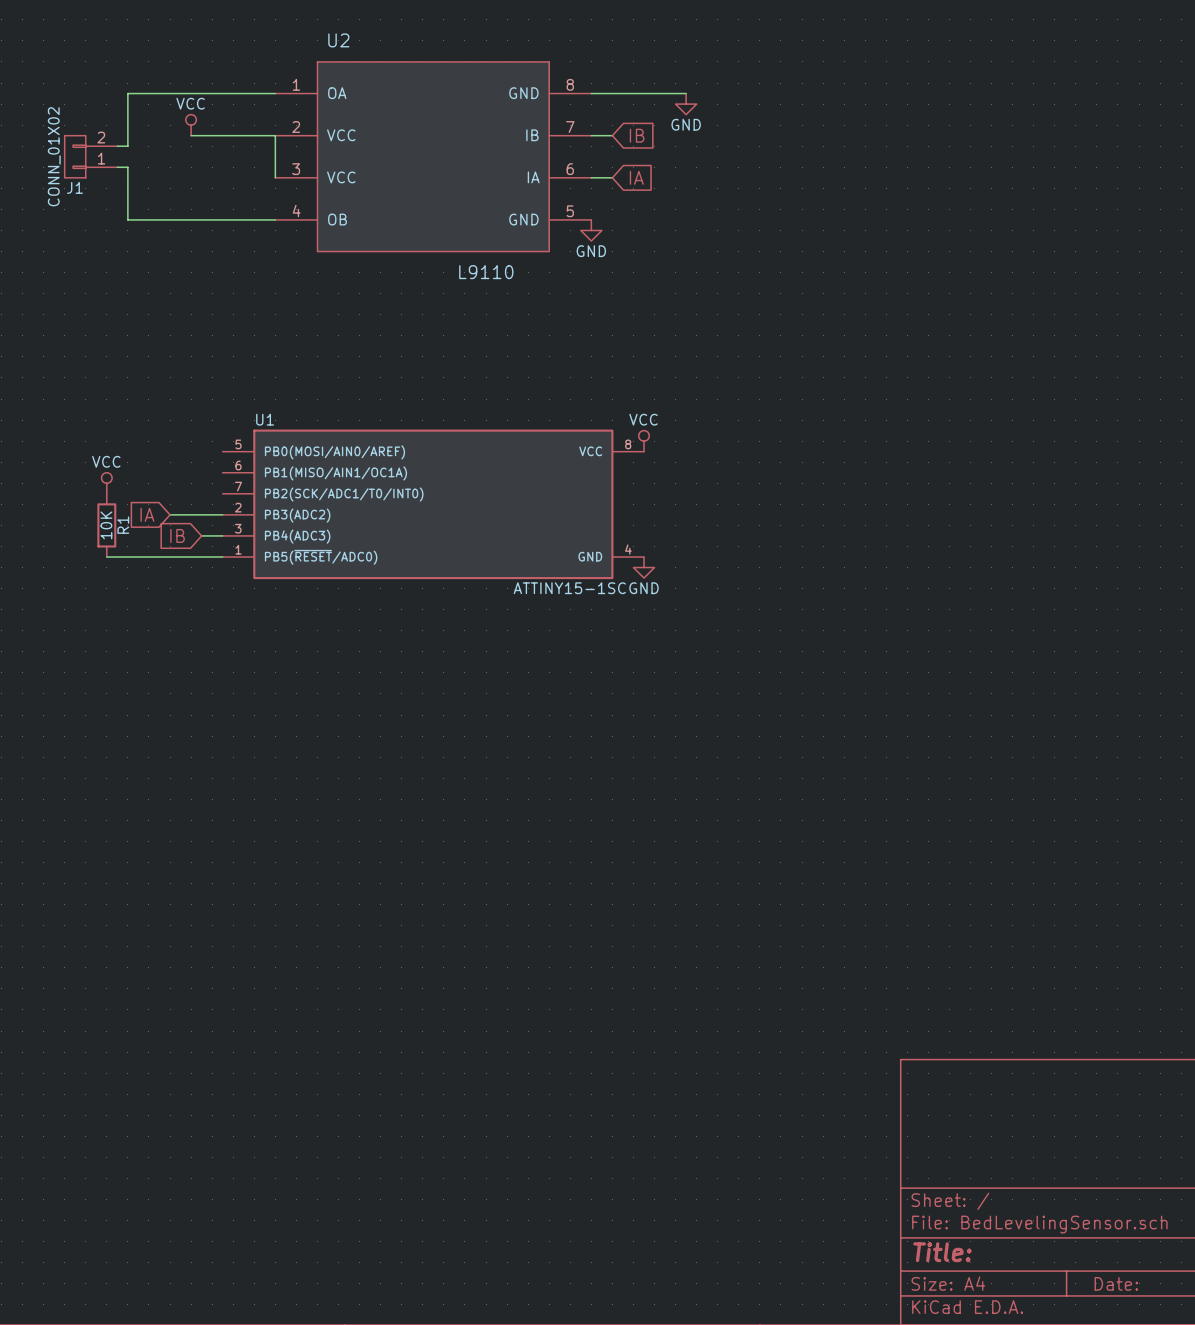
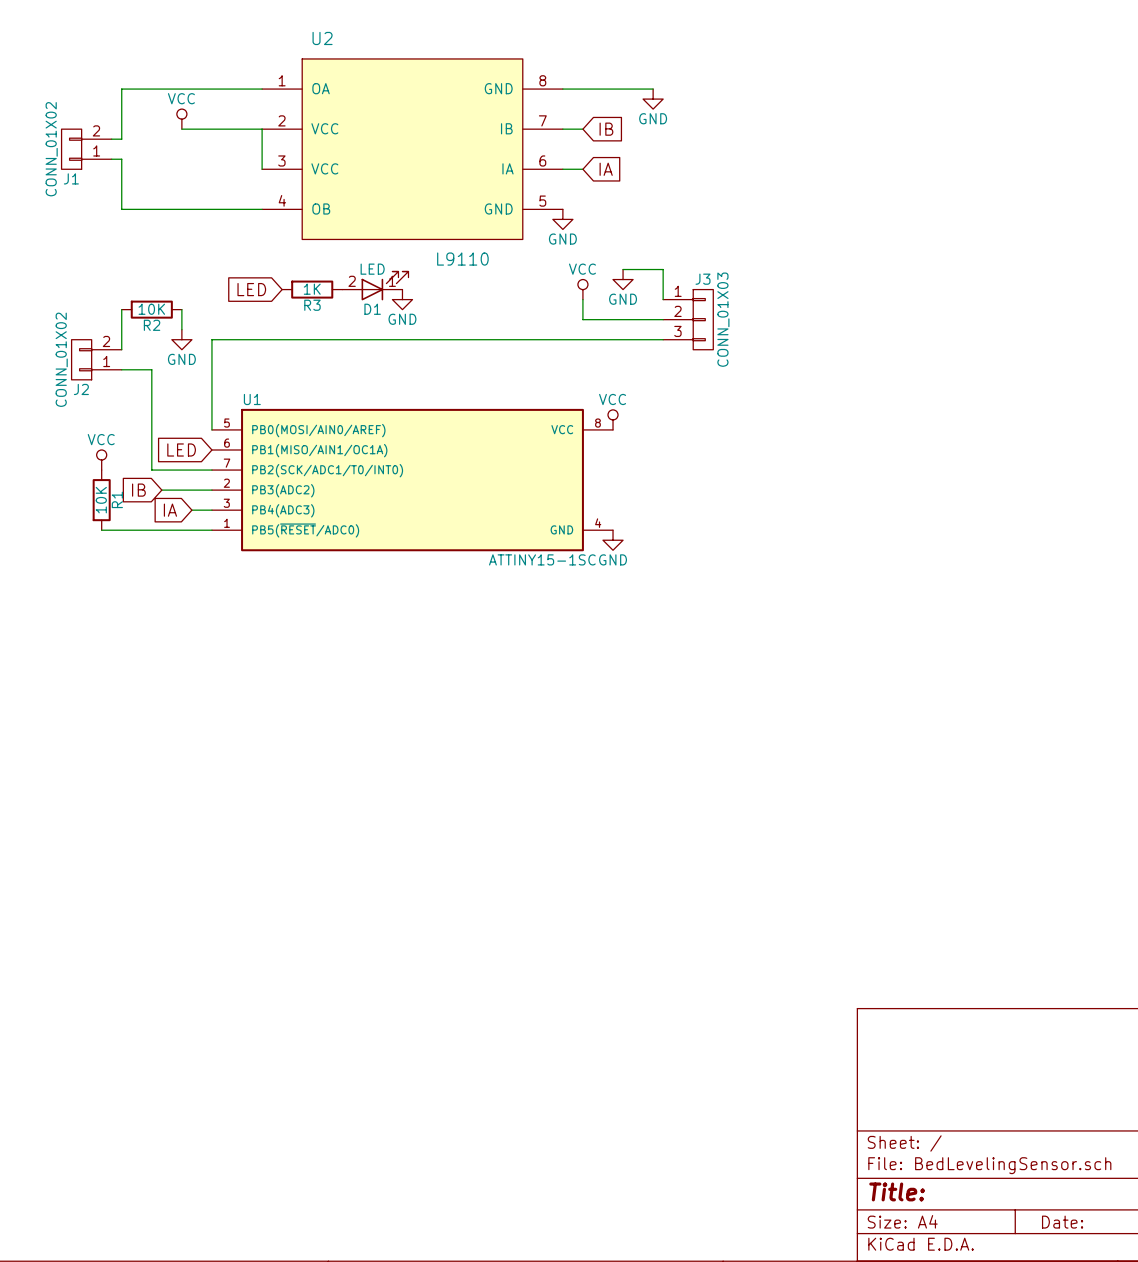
wire: none -> (623, 269) (663, 269) (663, 299)
power symbol: none -> GND (623, 279)
D1: none -> LED (375, 285)
global label: none -> LED (251, 289)
R3: none -> 1K (312, 289)
power symbol: none -> VCC (582, 289)
power symbol: none -> GND (402, 299)
wire: none -> (582, 299) (582, 319) (663, 319)
wire: none -> (121, 309) (121, 349)
R2: none -> 10K (151, 309)
wire: none -> (181, 309) (181, 329)
J3: none -> CONN_01X03 (688, 319)
power symbol: none -> GND (181, 339)
wire: none -> (663, 339) (211, 339) (211, 429)
J2: none -> CONN_01X02 (96, 359)
wire: none -> (121, 369) (151, 369) (151, 470) (211, 470)
global label: none -> LED (181, 450)
global label: IA (147, 514) -> IB (138, 490)
global label: IB (177, 535) -> IA (170, 510)

